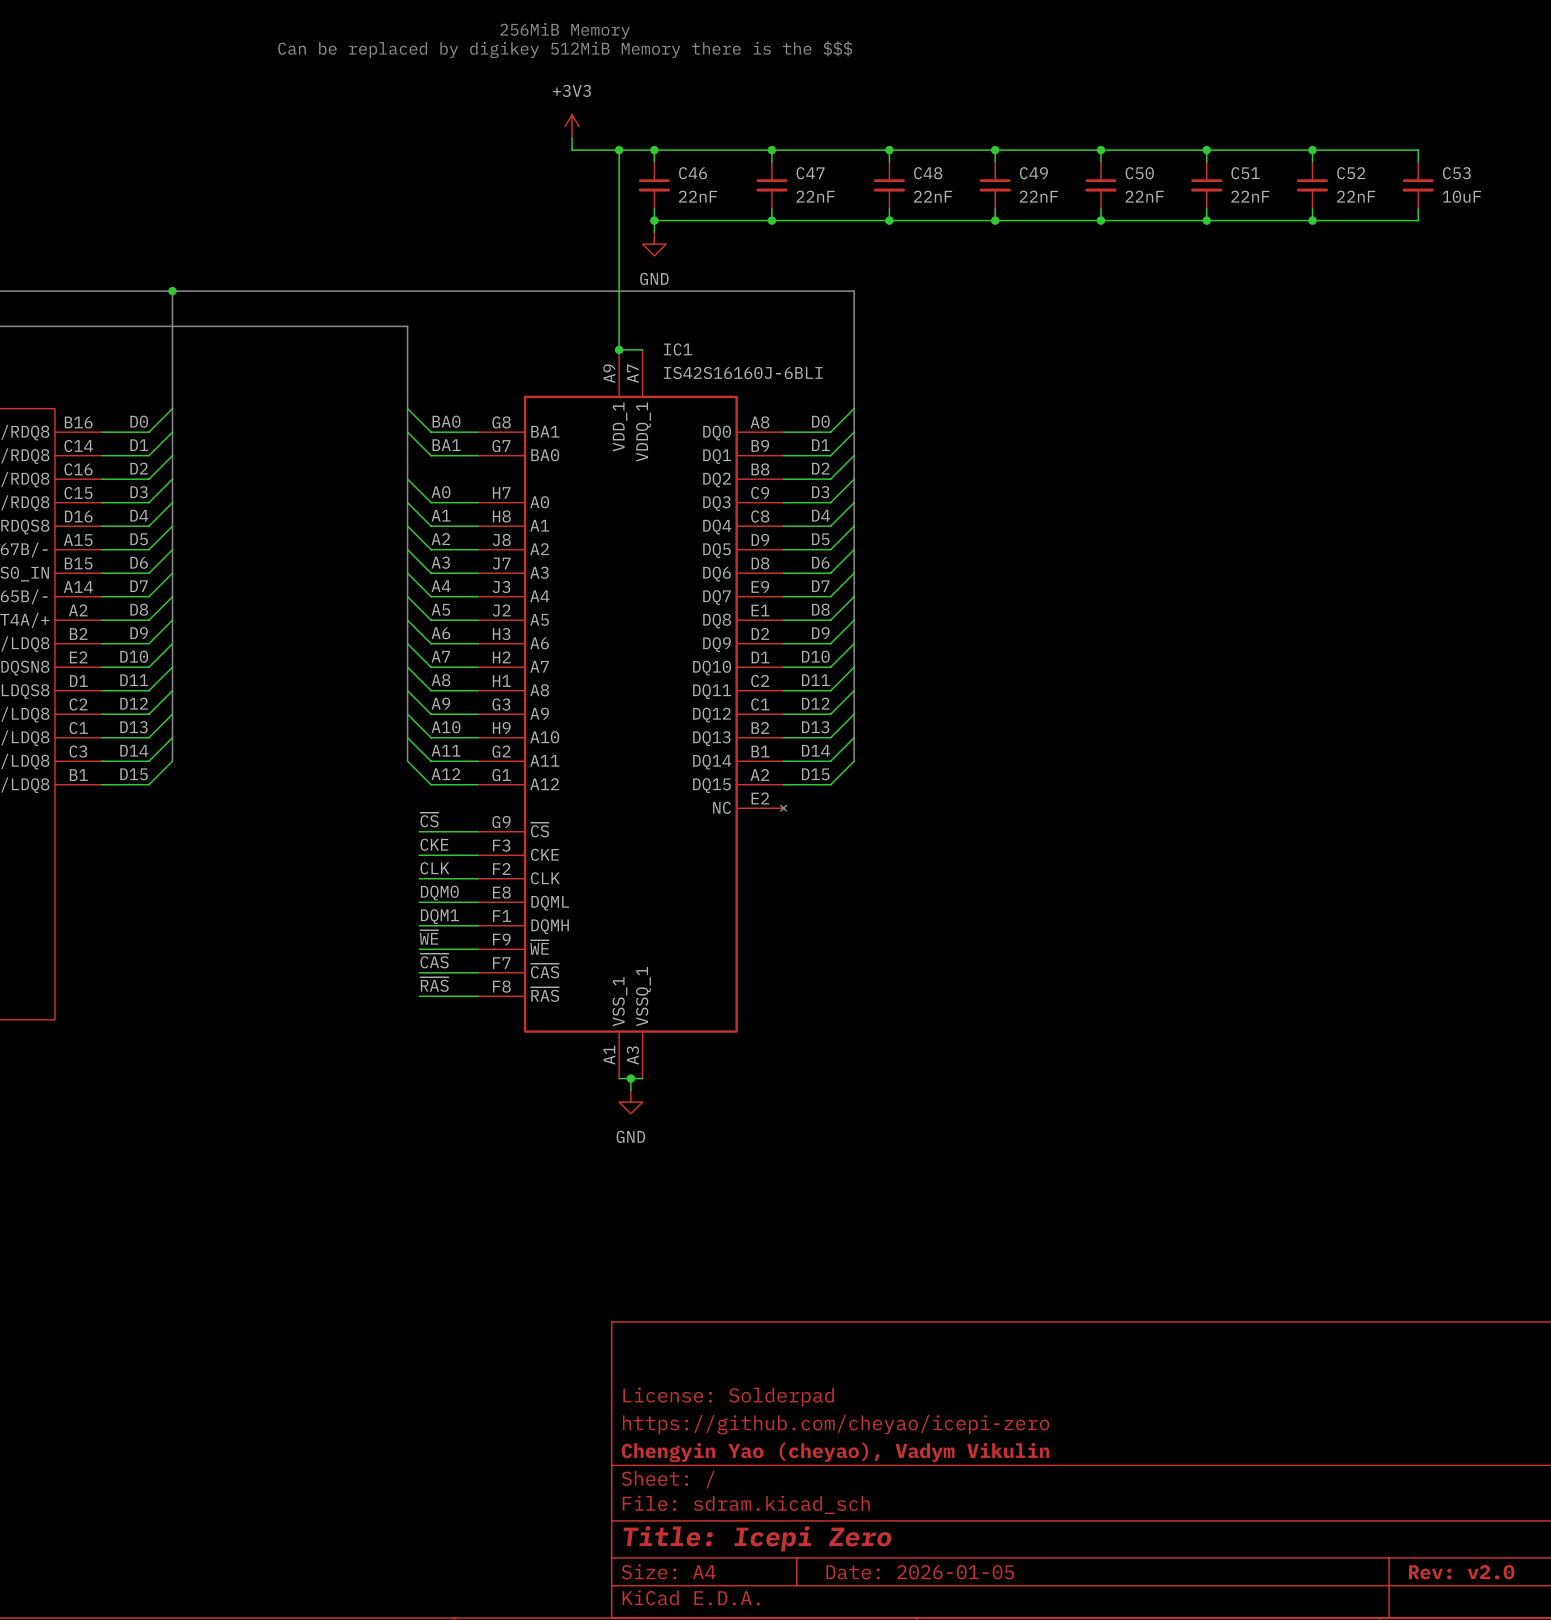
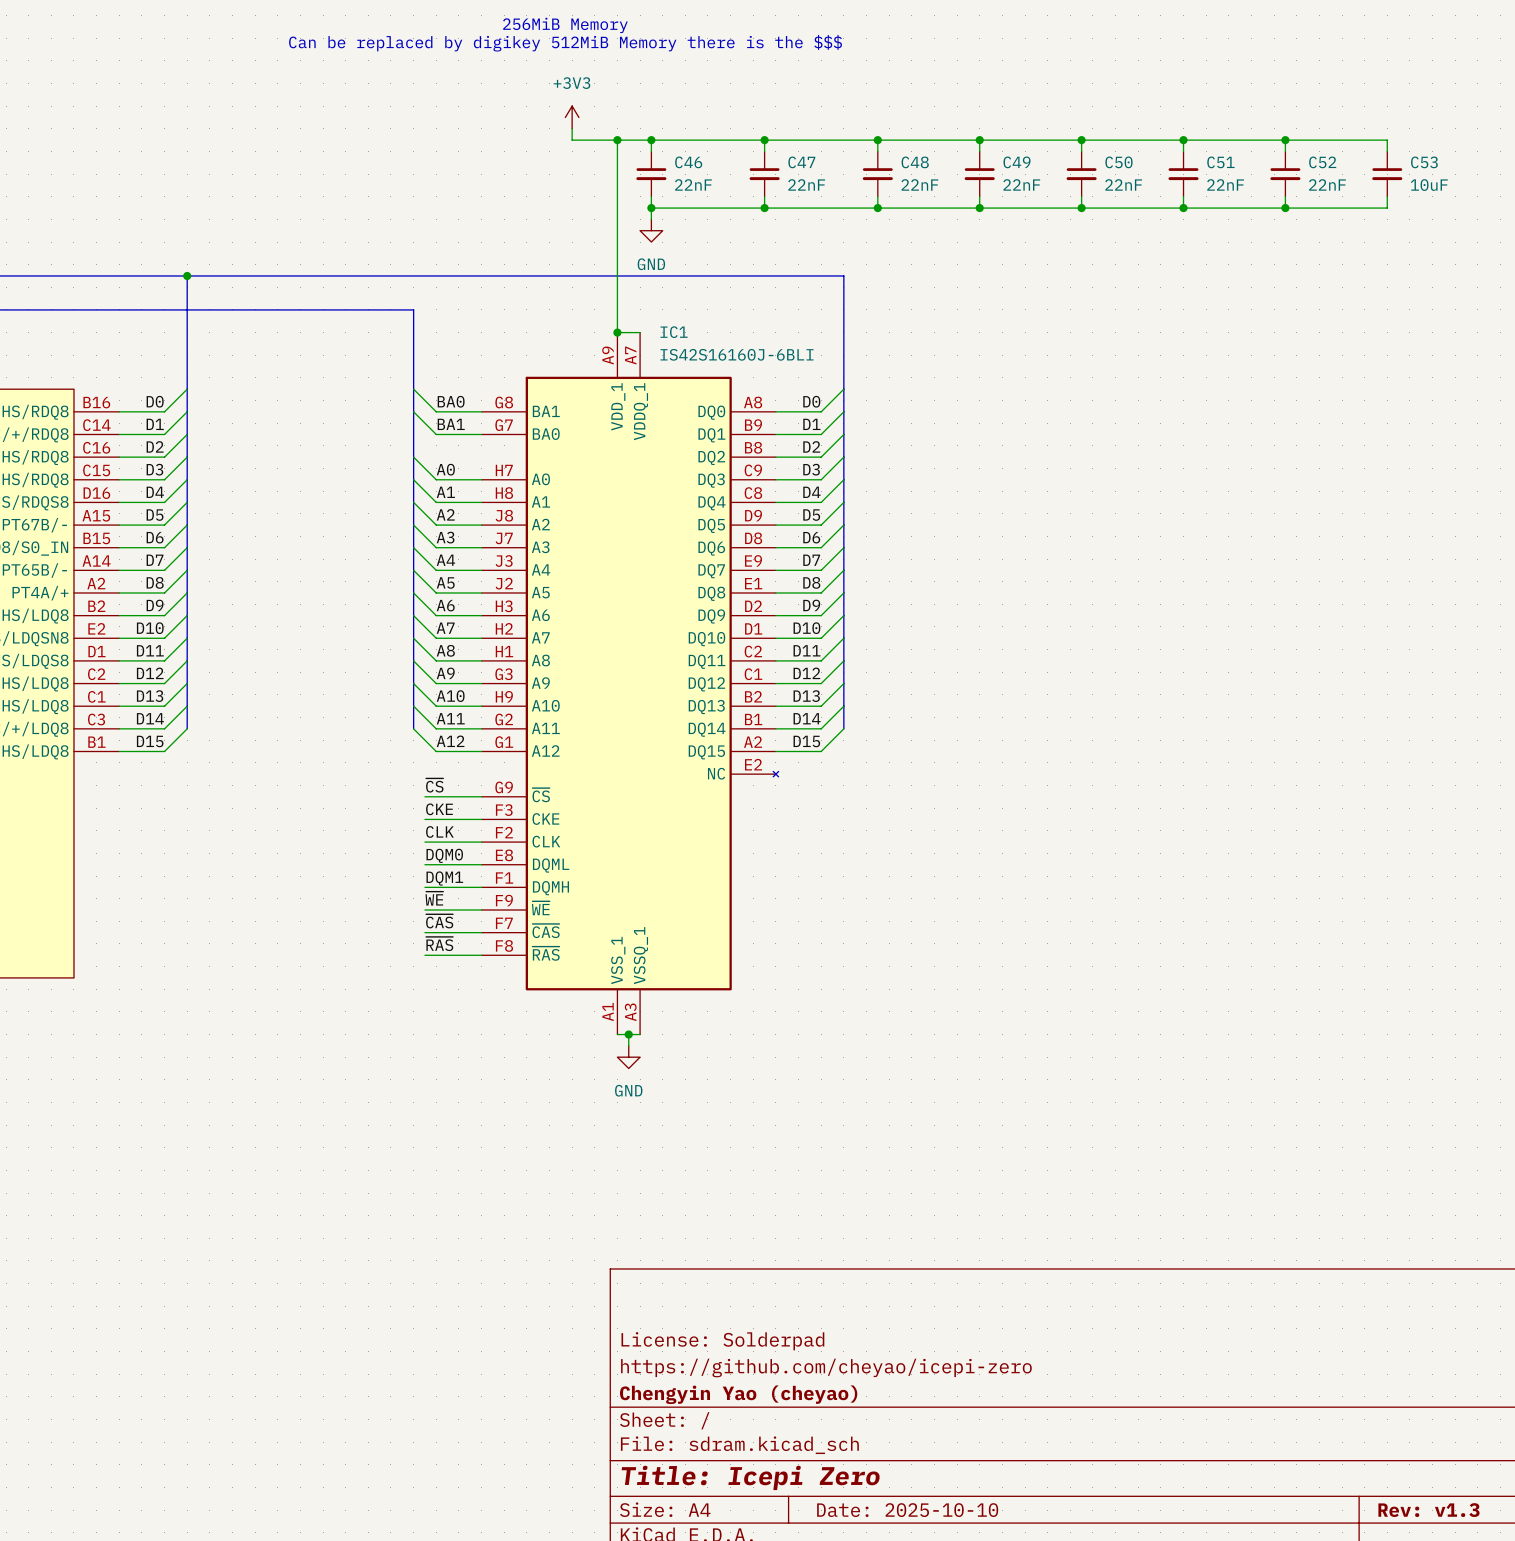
title block: Chengyin Yao (cheyao), Vadym Vikulin (835, 1452) -> Chengyin Yao (cheyao) (738, 1394)
title block: Date: 2026-01-05 (920, 1572) -> Date: 2025-10-10 (907, 1510)
title block: Rev: v2.0 (1461, 1572) -> Rev: v1.3 (1428, 1510)

